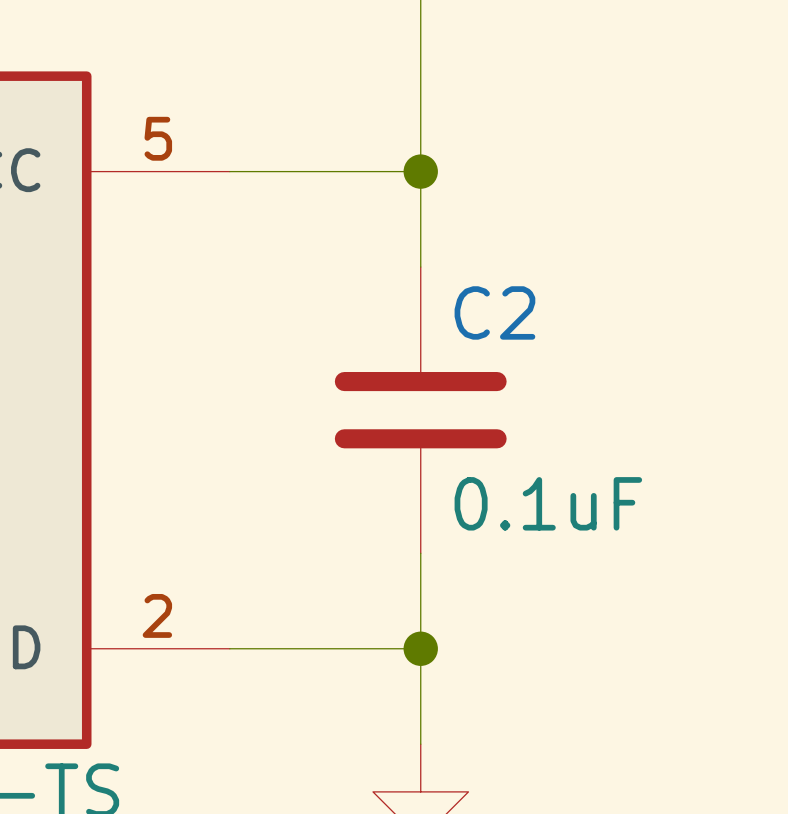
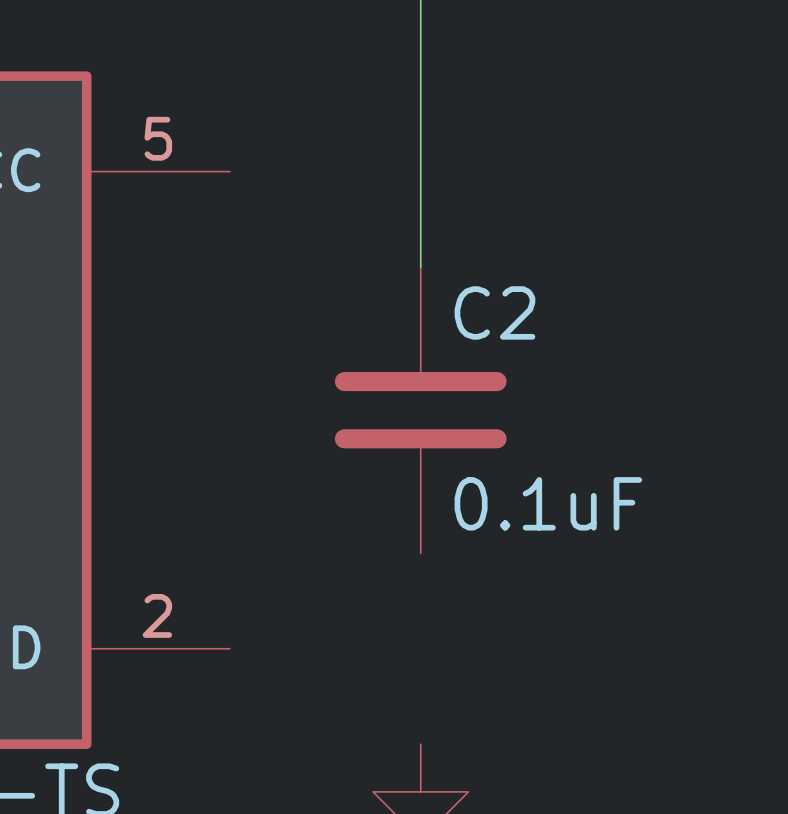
wire: (229, 171) (420, 171) -> none
junction: (420, 171) -> none
wire: (420, 553) (420, 744) -> none
wire: (229, 648) (420, 648) -> none
junction: (420, 648) -> none

